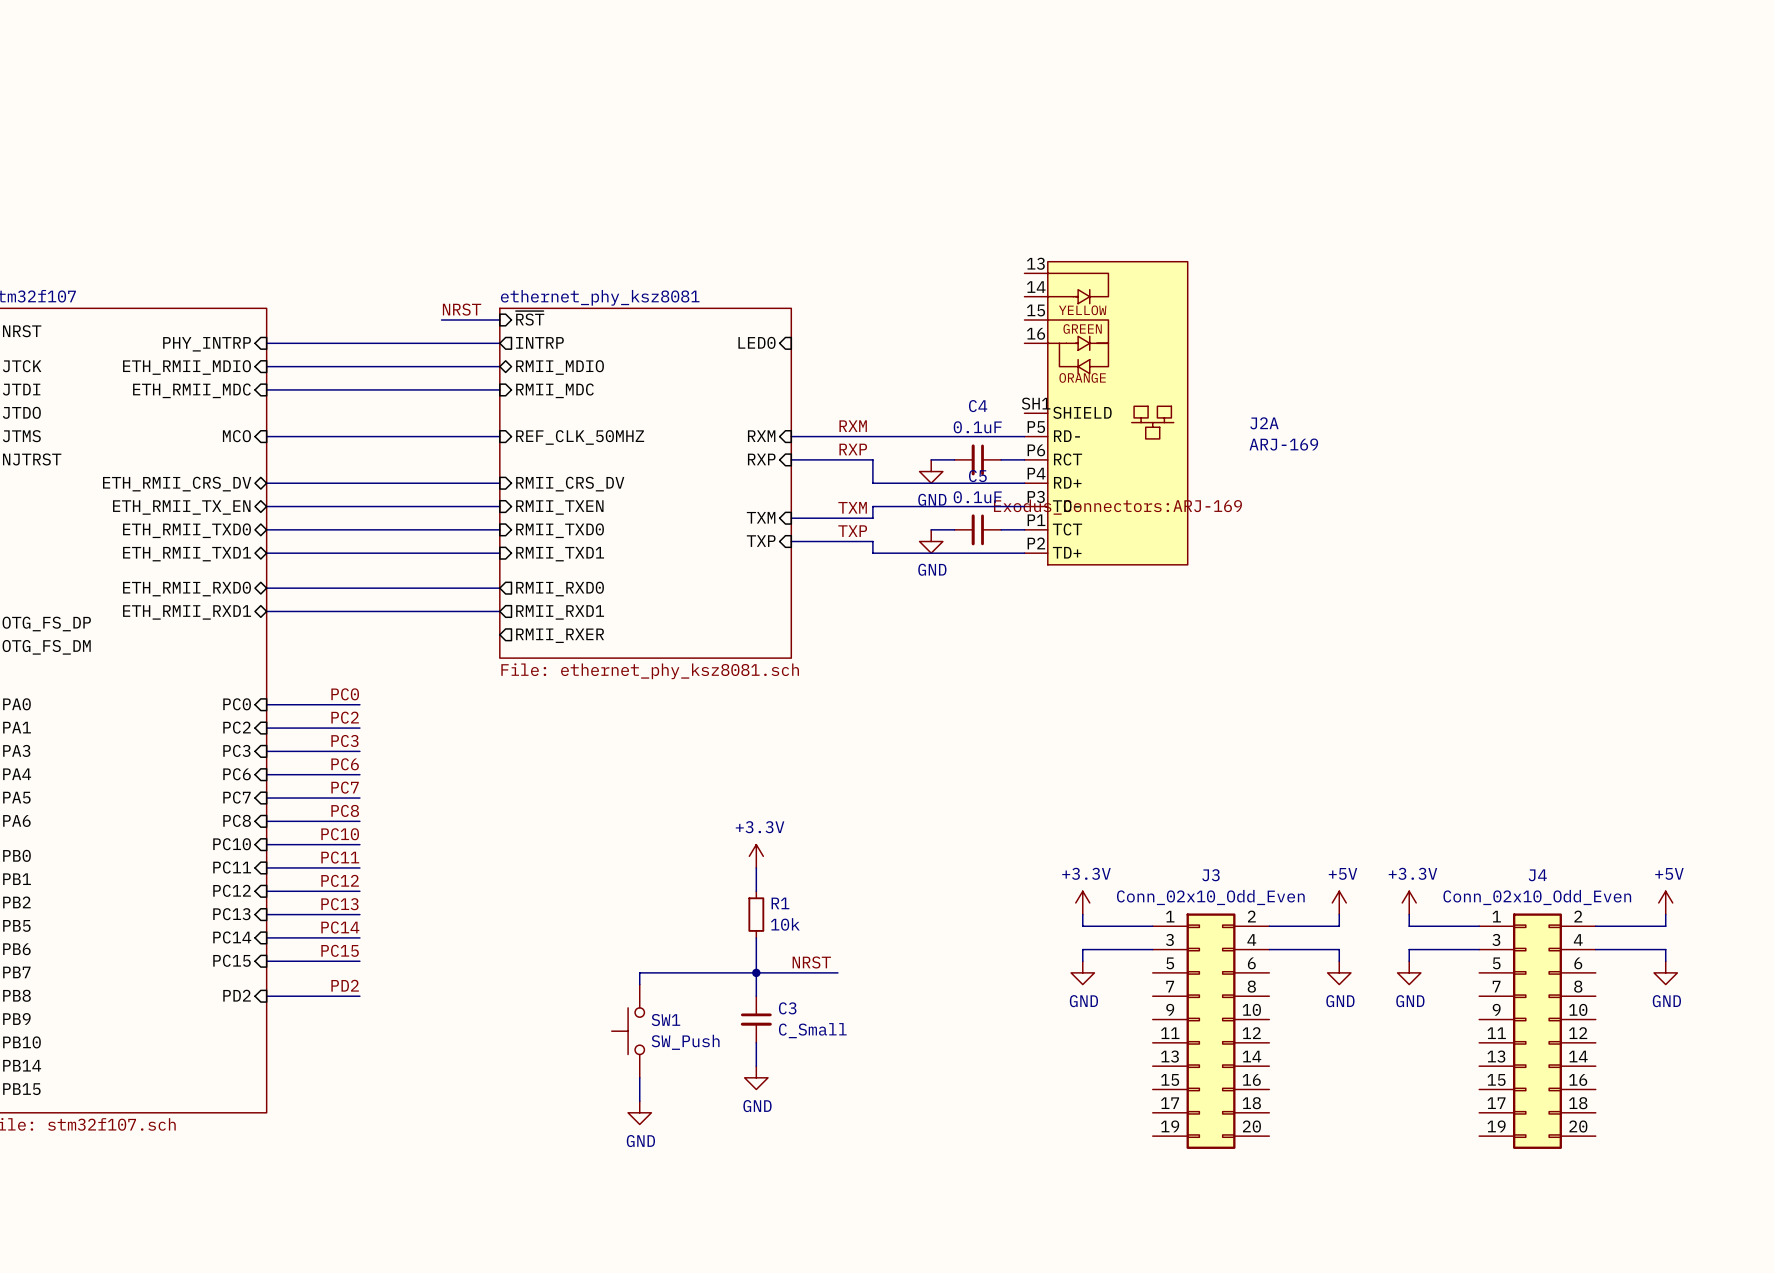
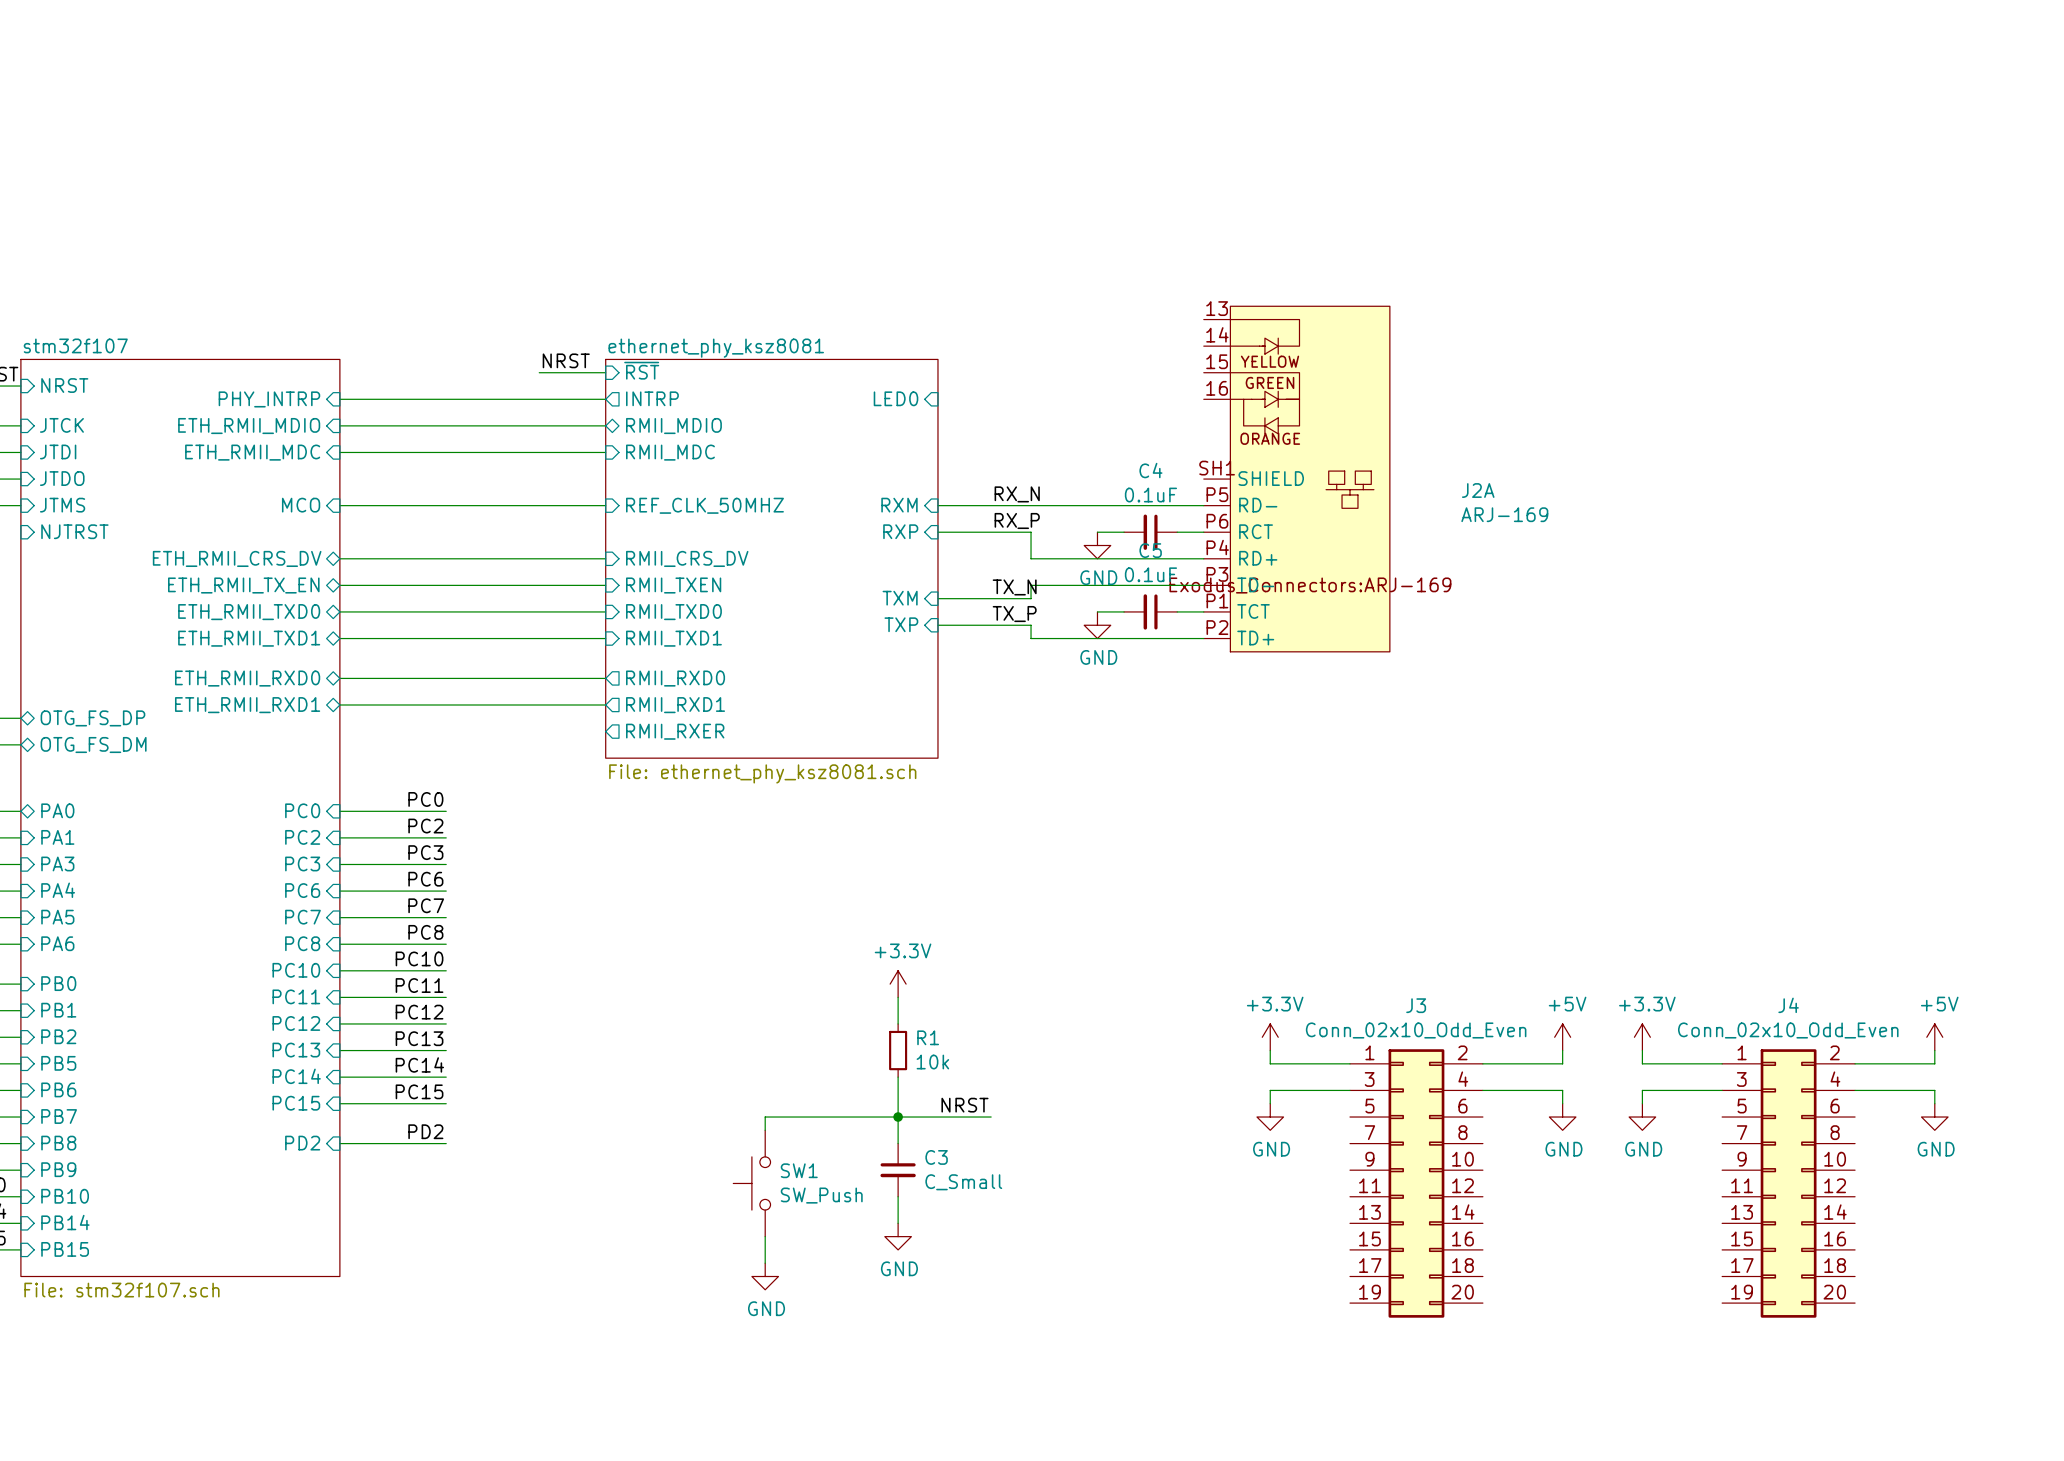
label: RXM (853, 426) -> RX_N (1017, 494)
label: RXP (853, 449) -> RX_P (1017, 520)
label: TXM (852, 507) -> TX_N (1014, 587)
label: TXP (852, 531) -> TX_P (1014, 614)

